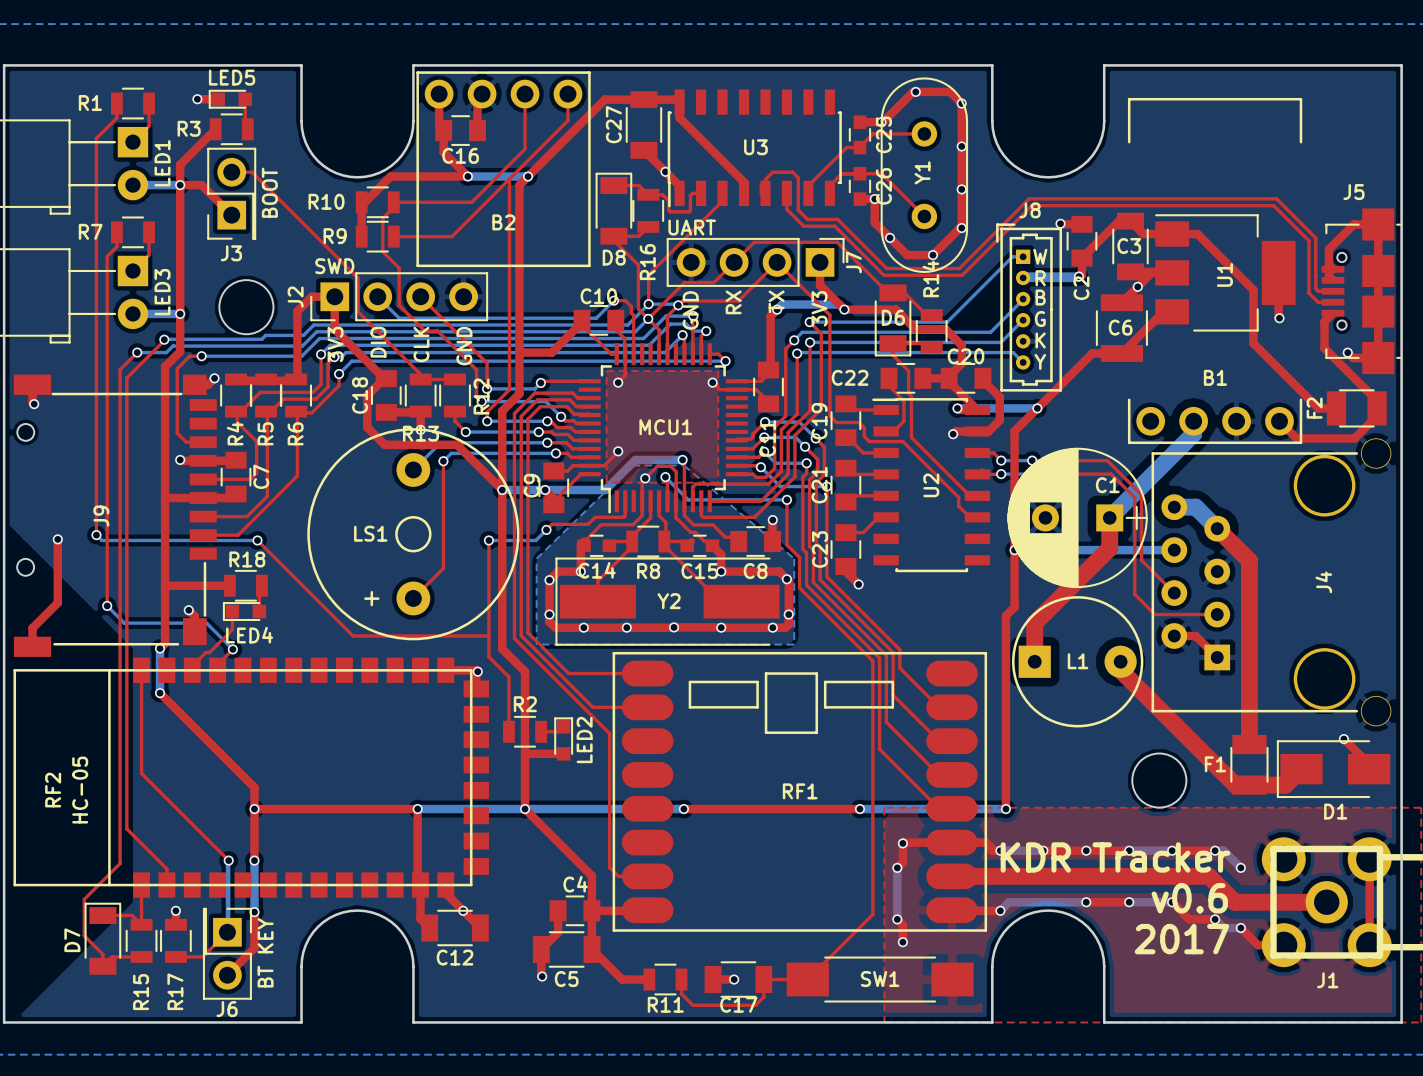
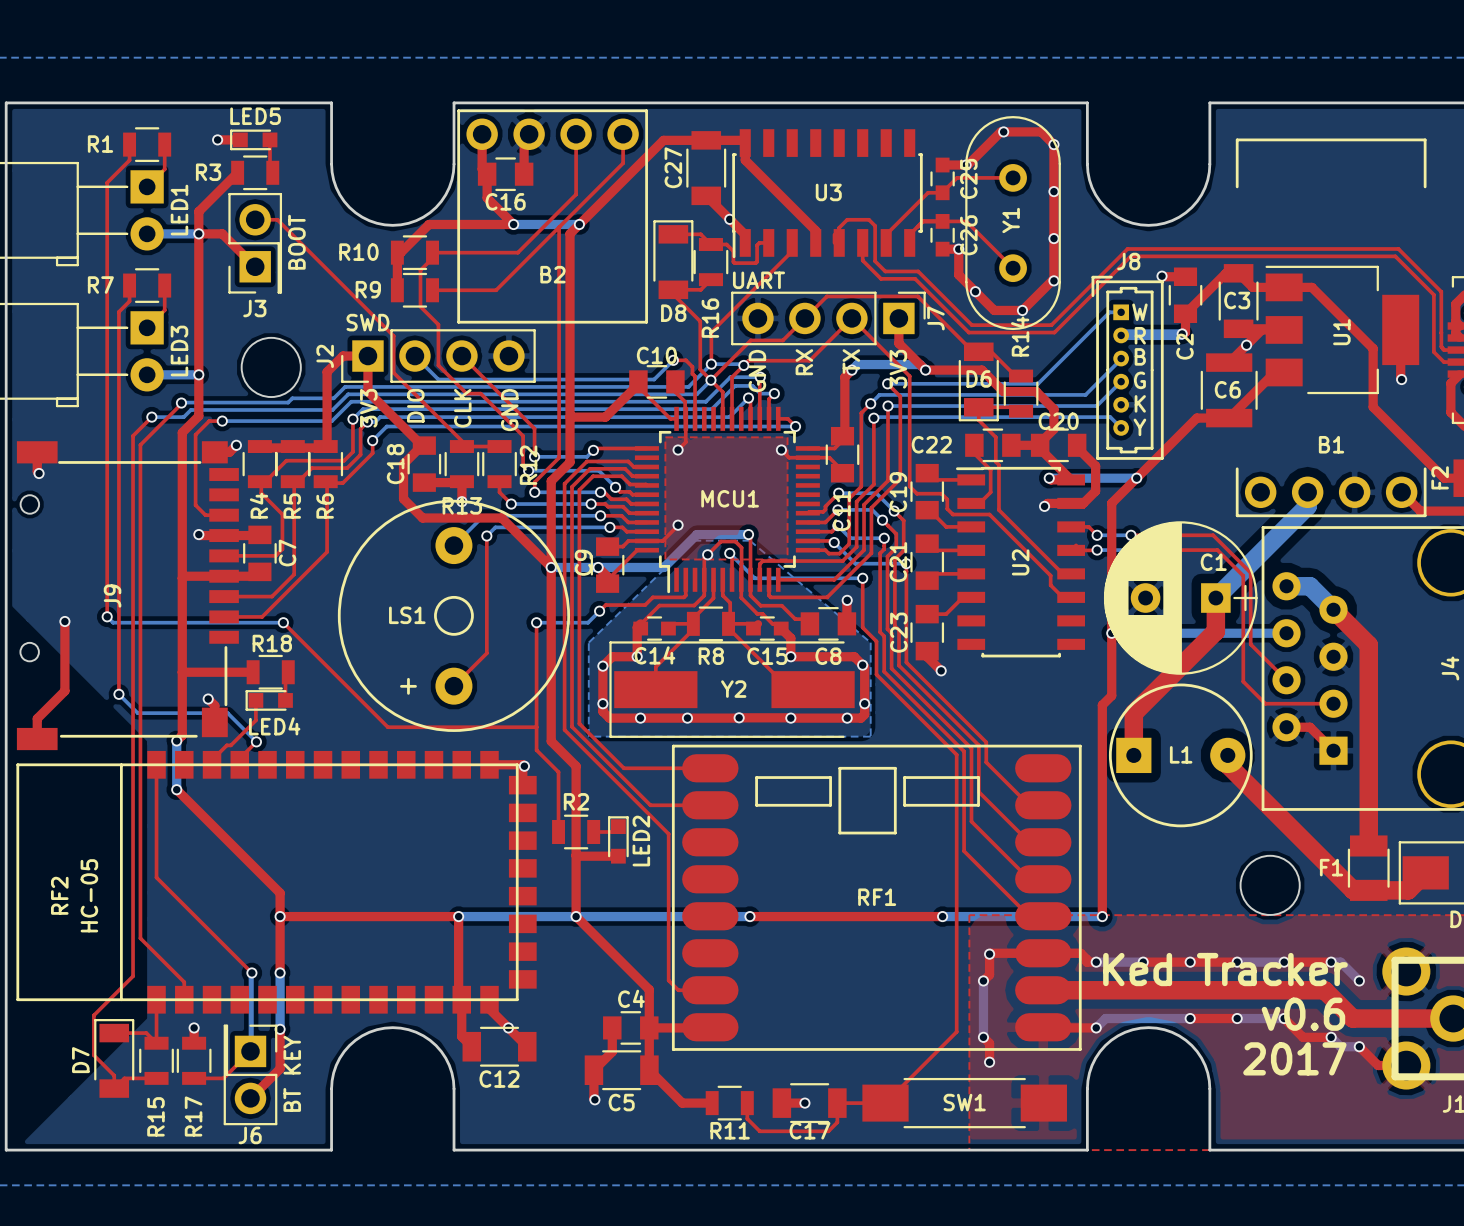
text: KDR Tracker (1115, 857) -> Ked Tracker (1225, 969)

